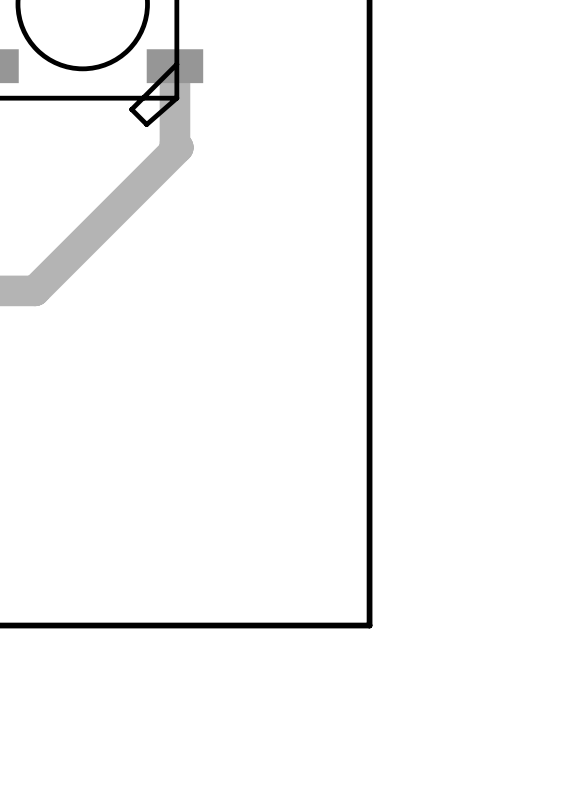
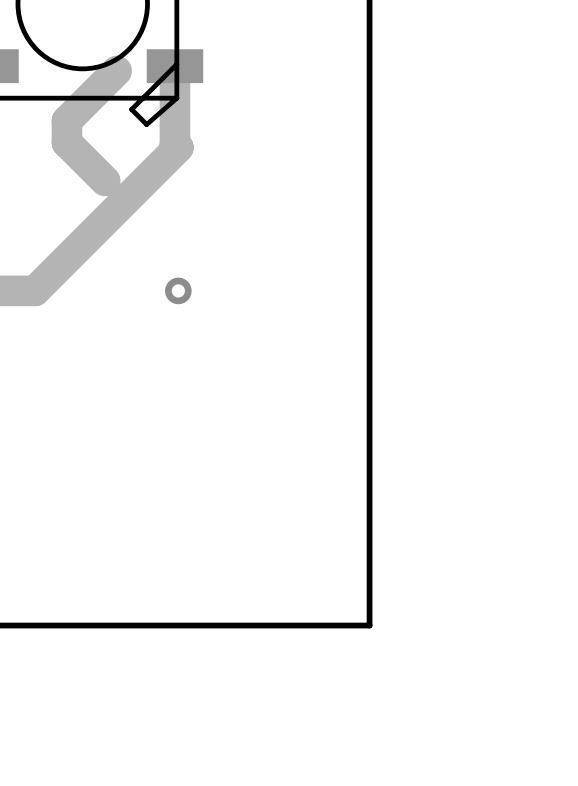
track: none -> (116, 71) (66, 120) (66, 142) (105, 180)
via: none -> (178, 290)

